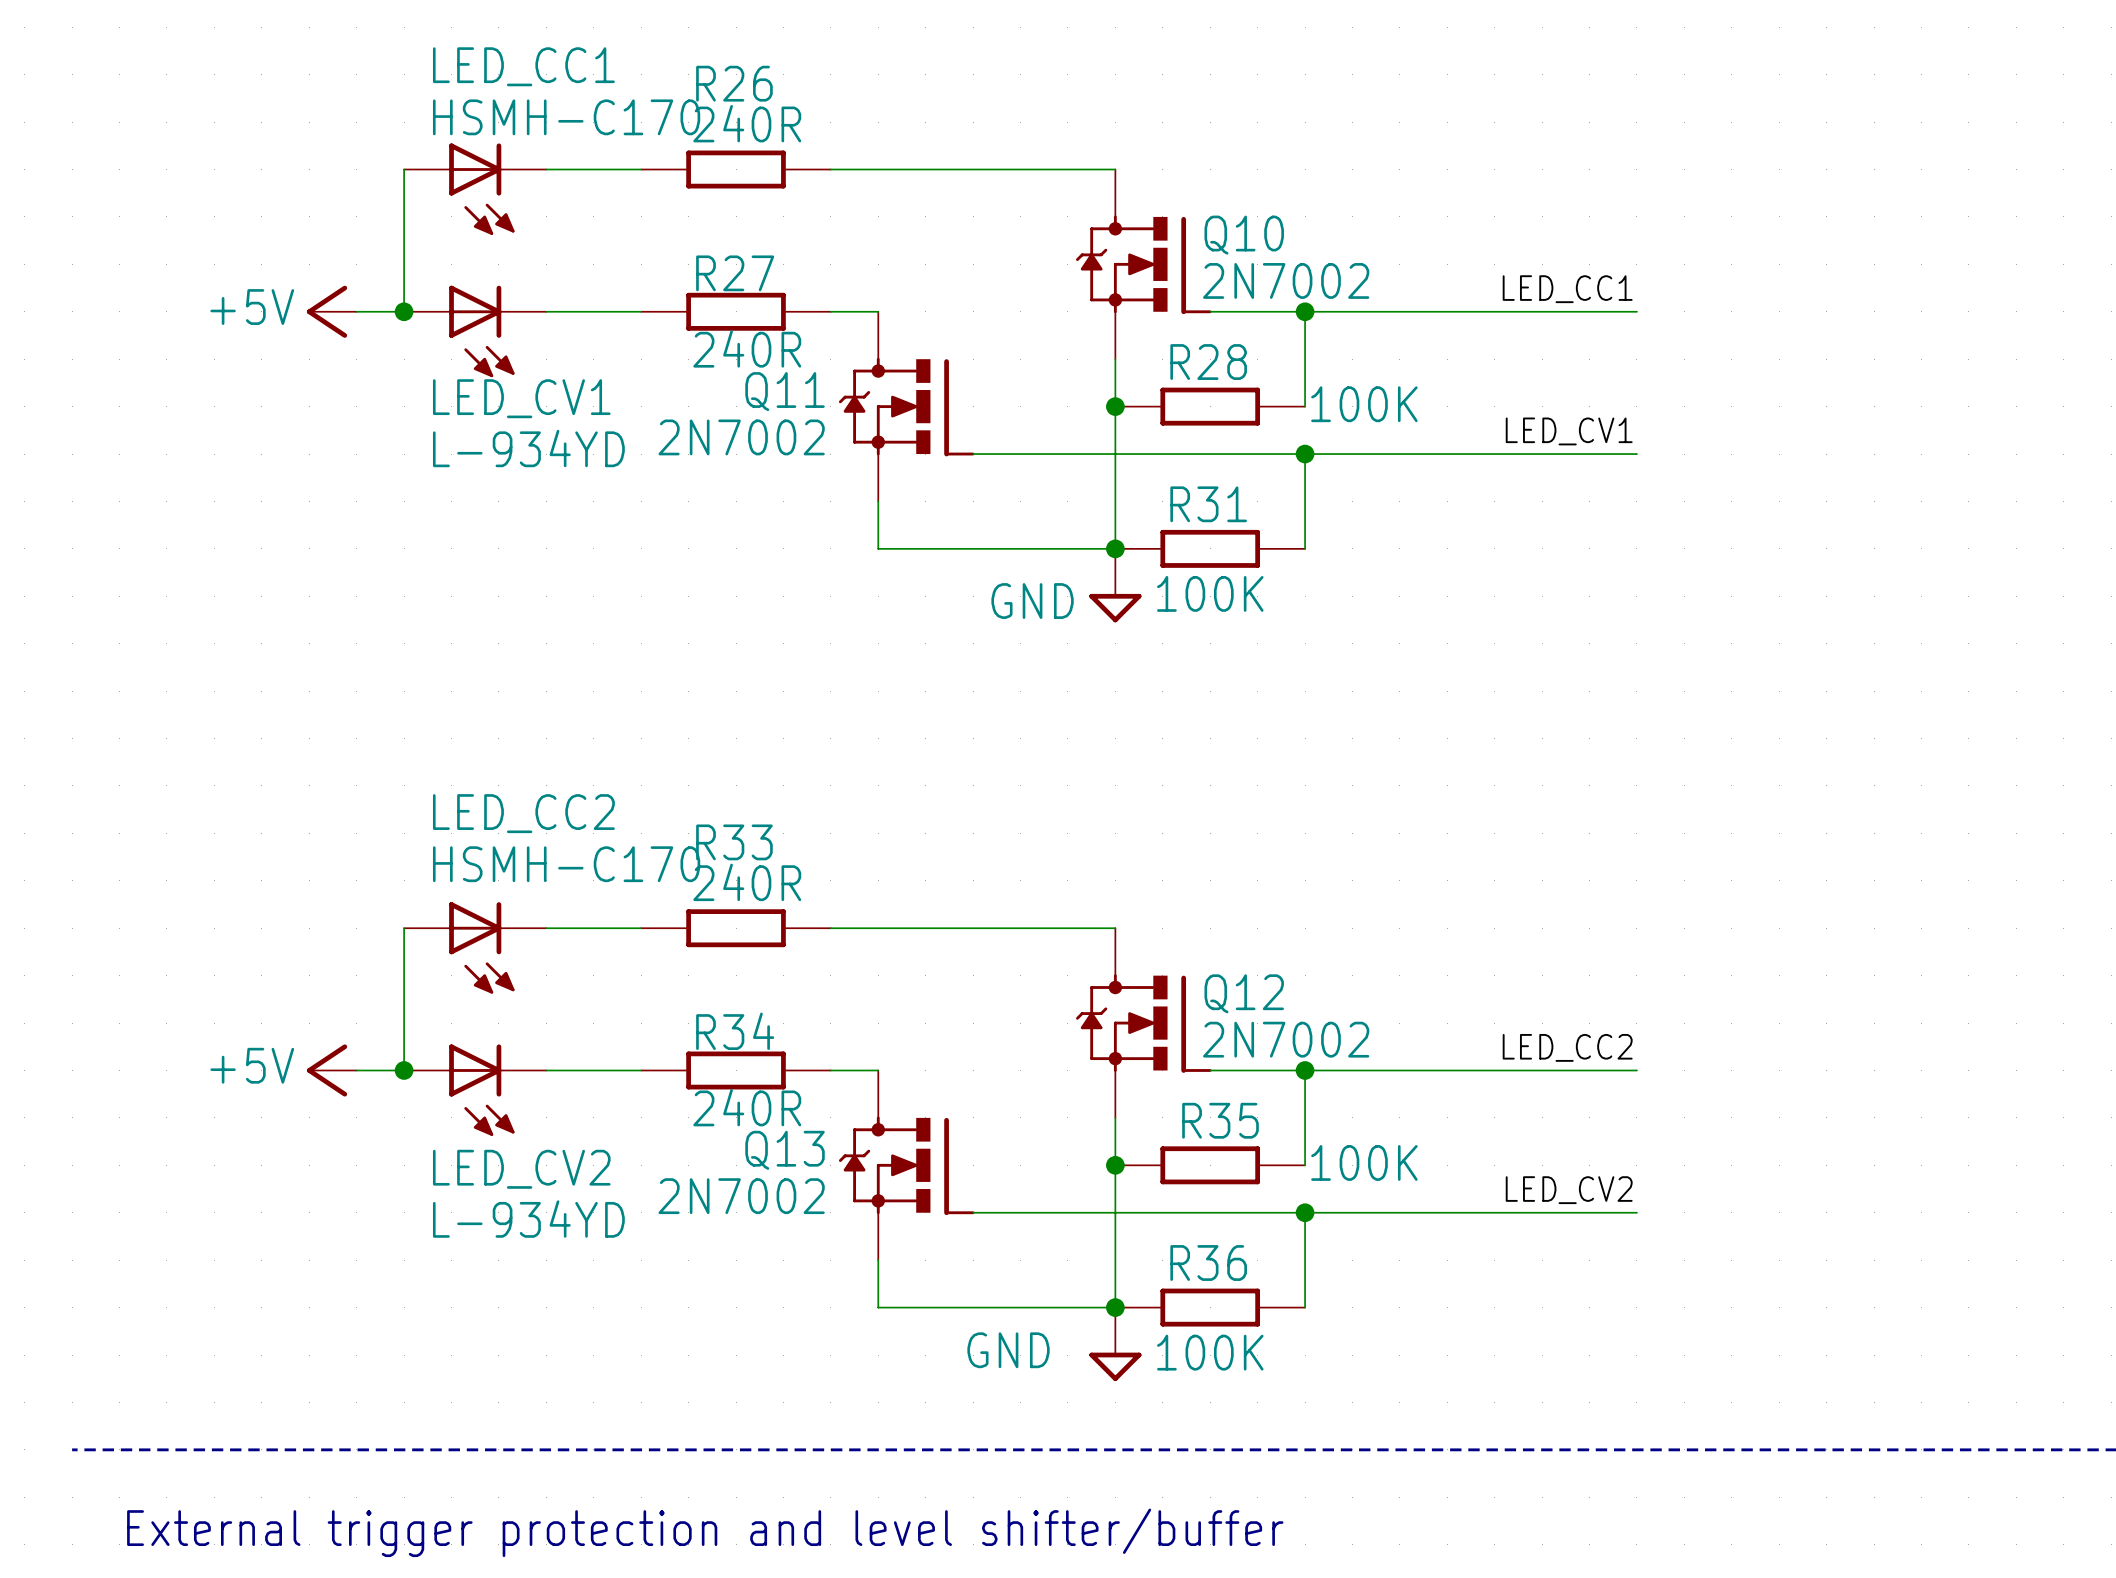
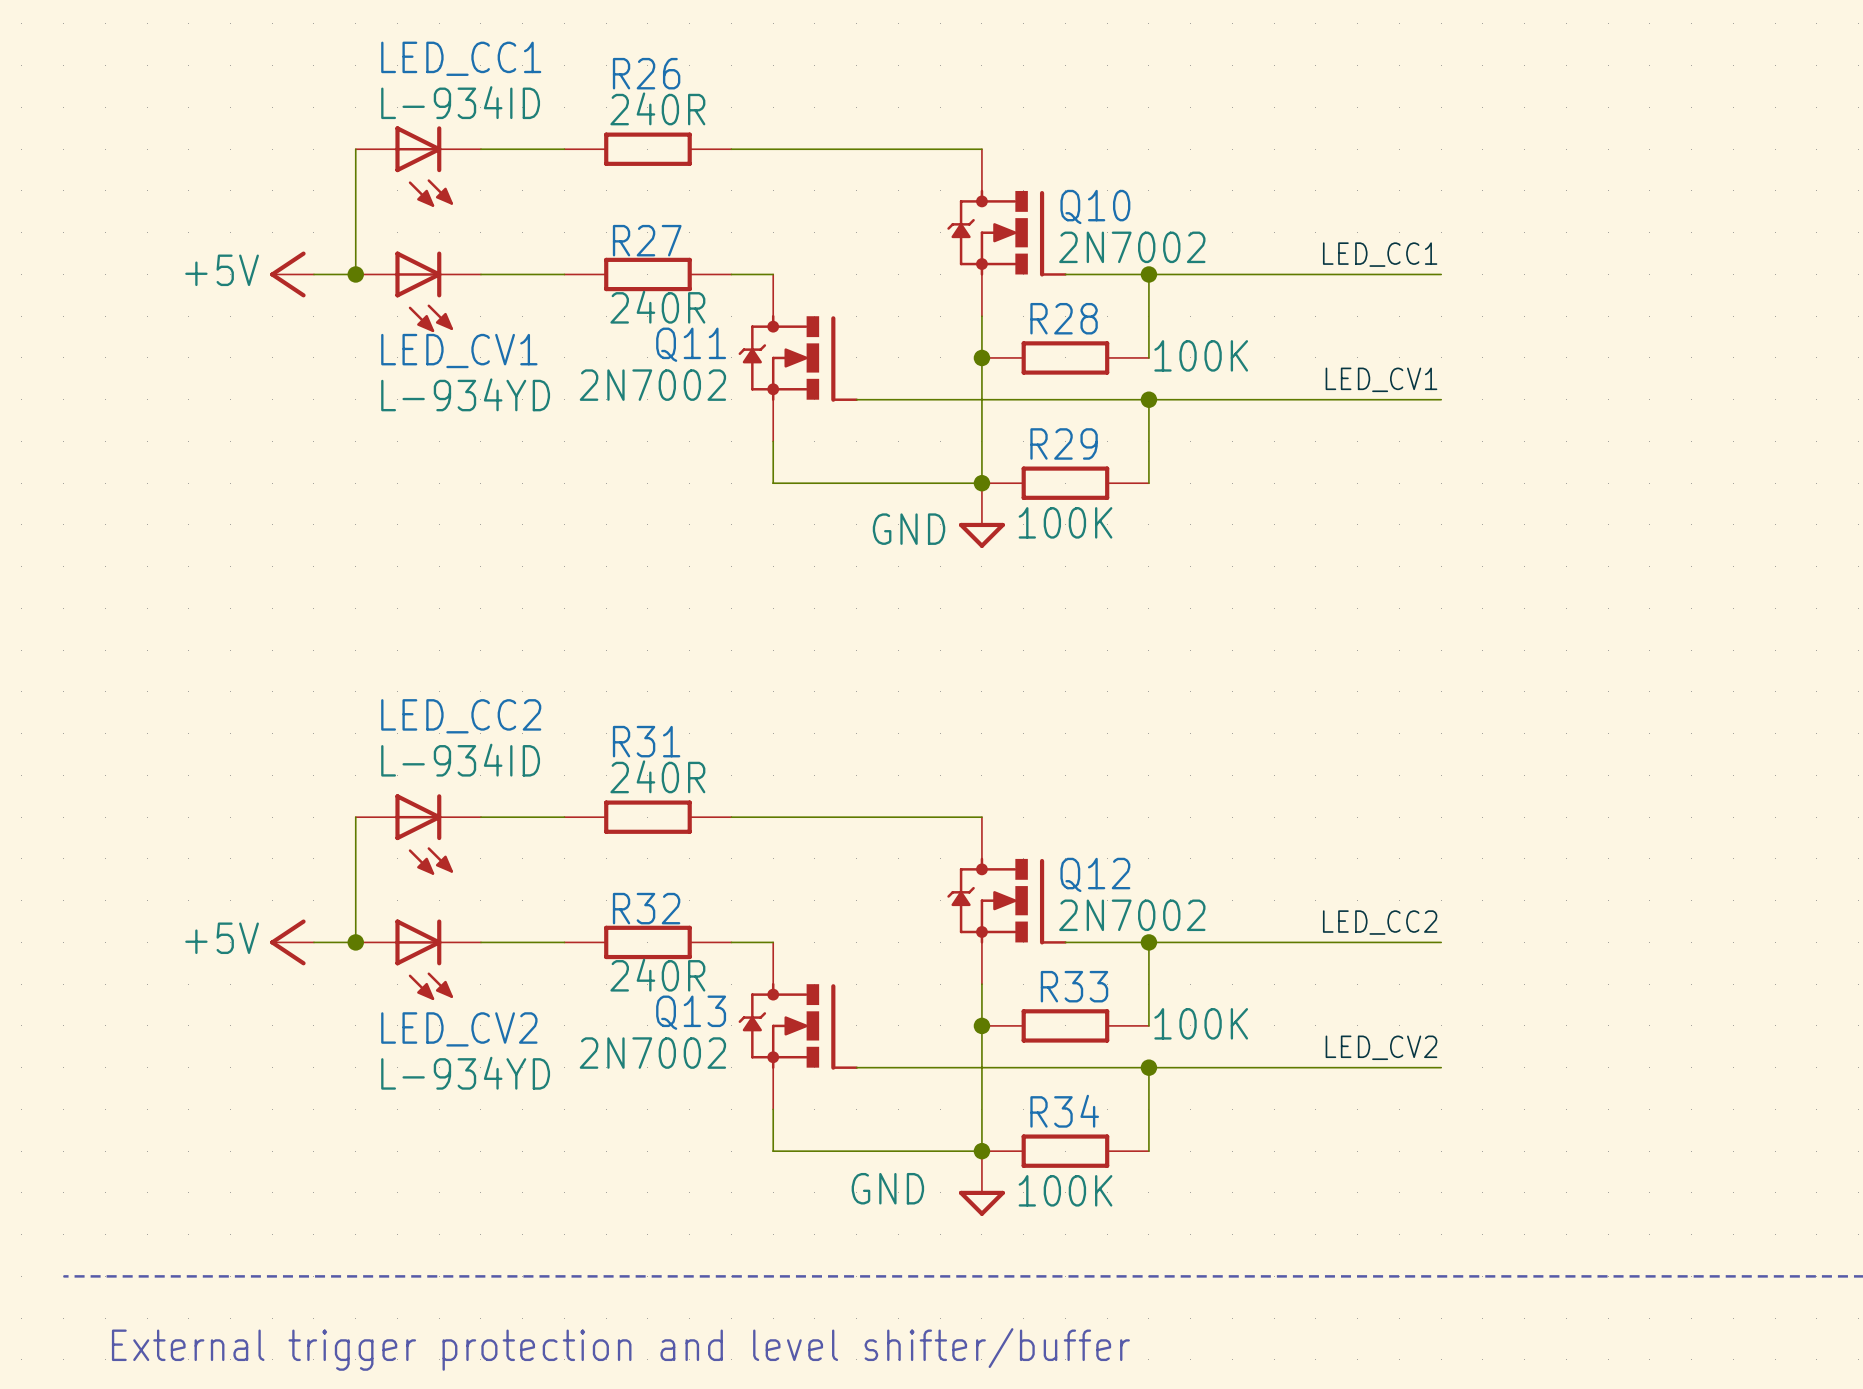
LED_CC1 value: HSMH-C170 (566, 117) -> L-934ID (460, 102)
R31 name: R31 (1208, 504) -> R29 (1064, 443)
R33 name: R33 (734, 842) -> R31 (646, 741)
LED_CC2 value: HSMH-C170 (566, 864) -> L-934ID (460, 760)
R34 name: R34 (735, 1031) -> R32 (646, 908)
R35 name: R35 (1220, 1120) -> R33 (1074, 986)
R36 name: R36 (1208, 1263) -> R34 (1064, 1111)

